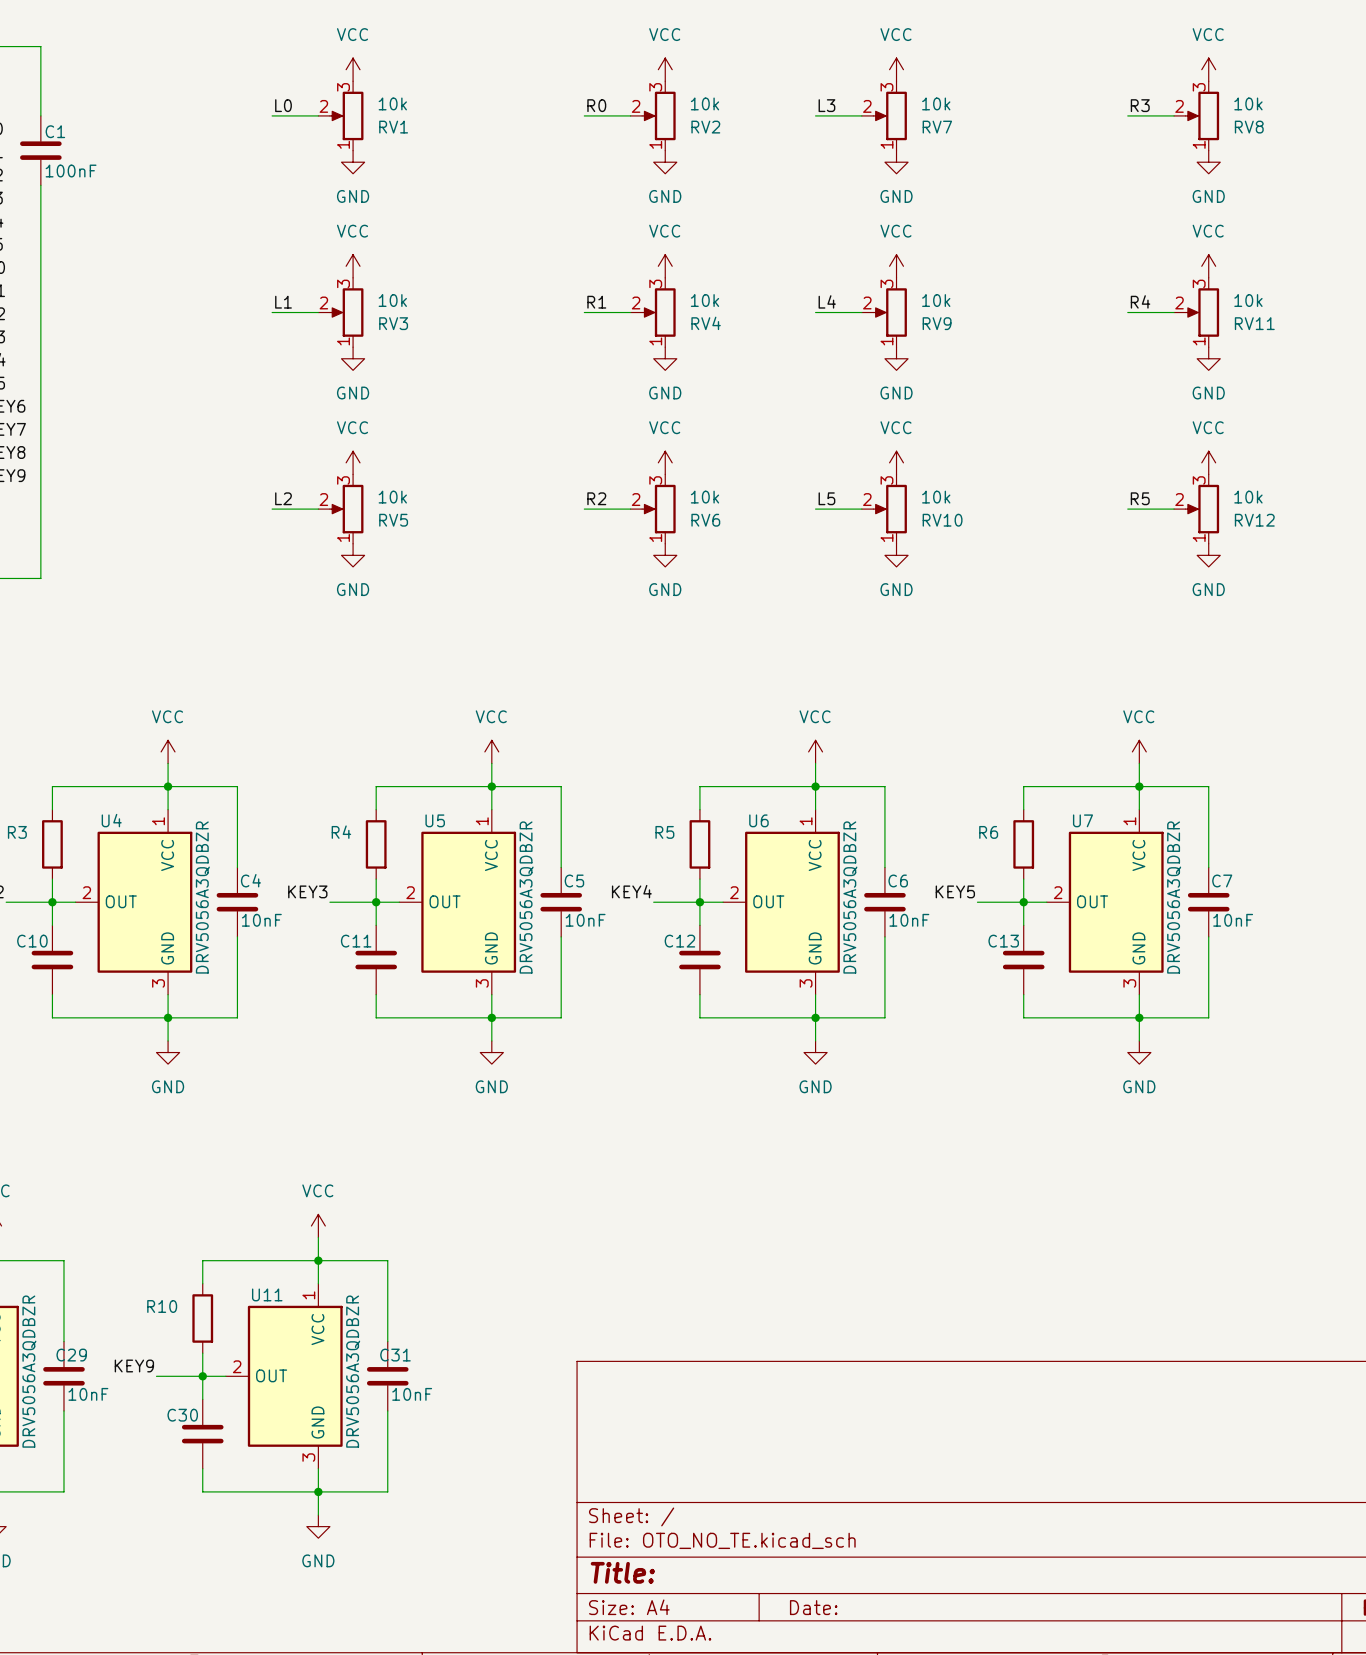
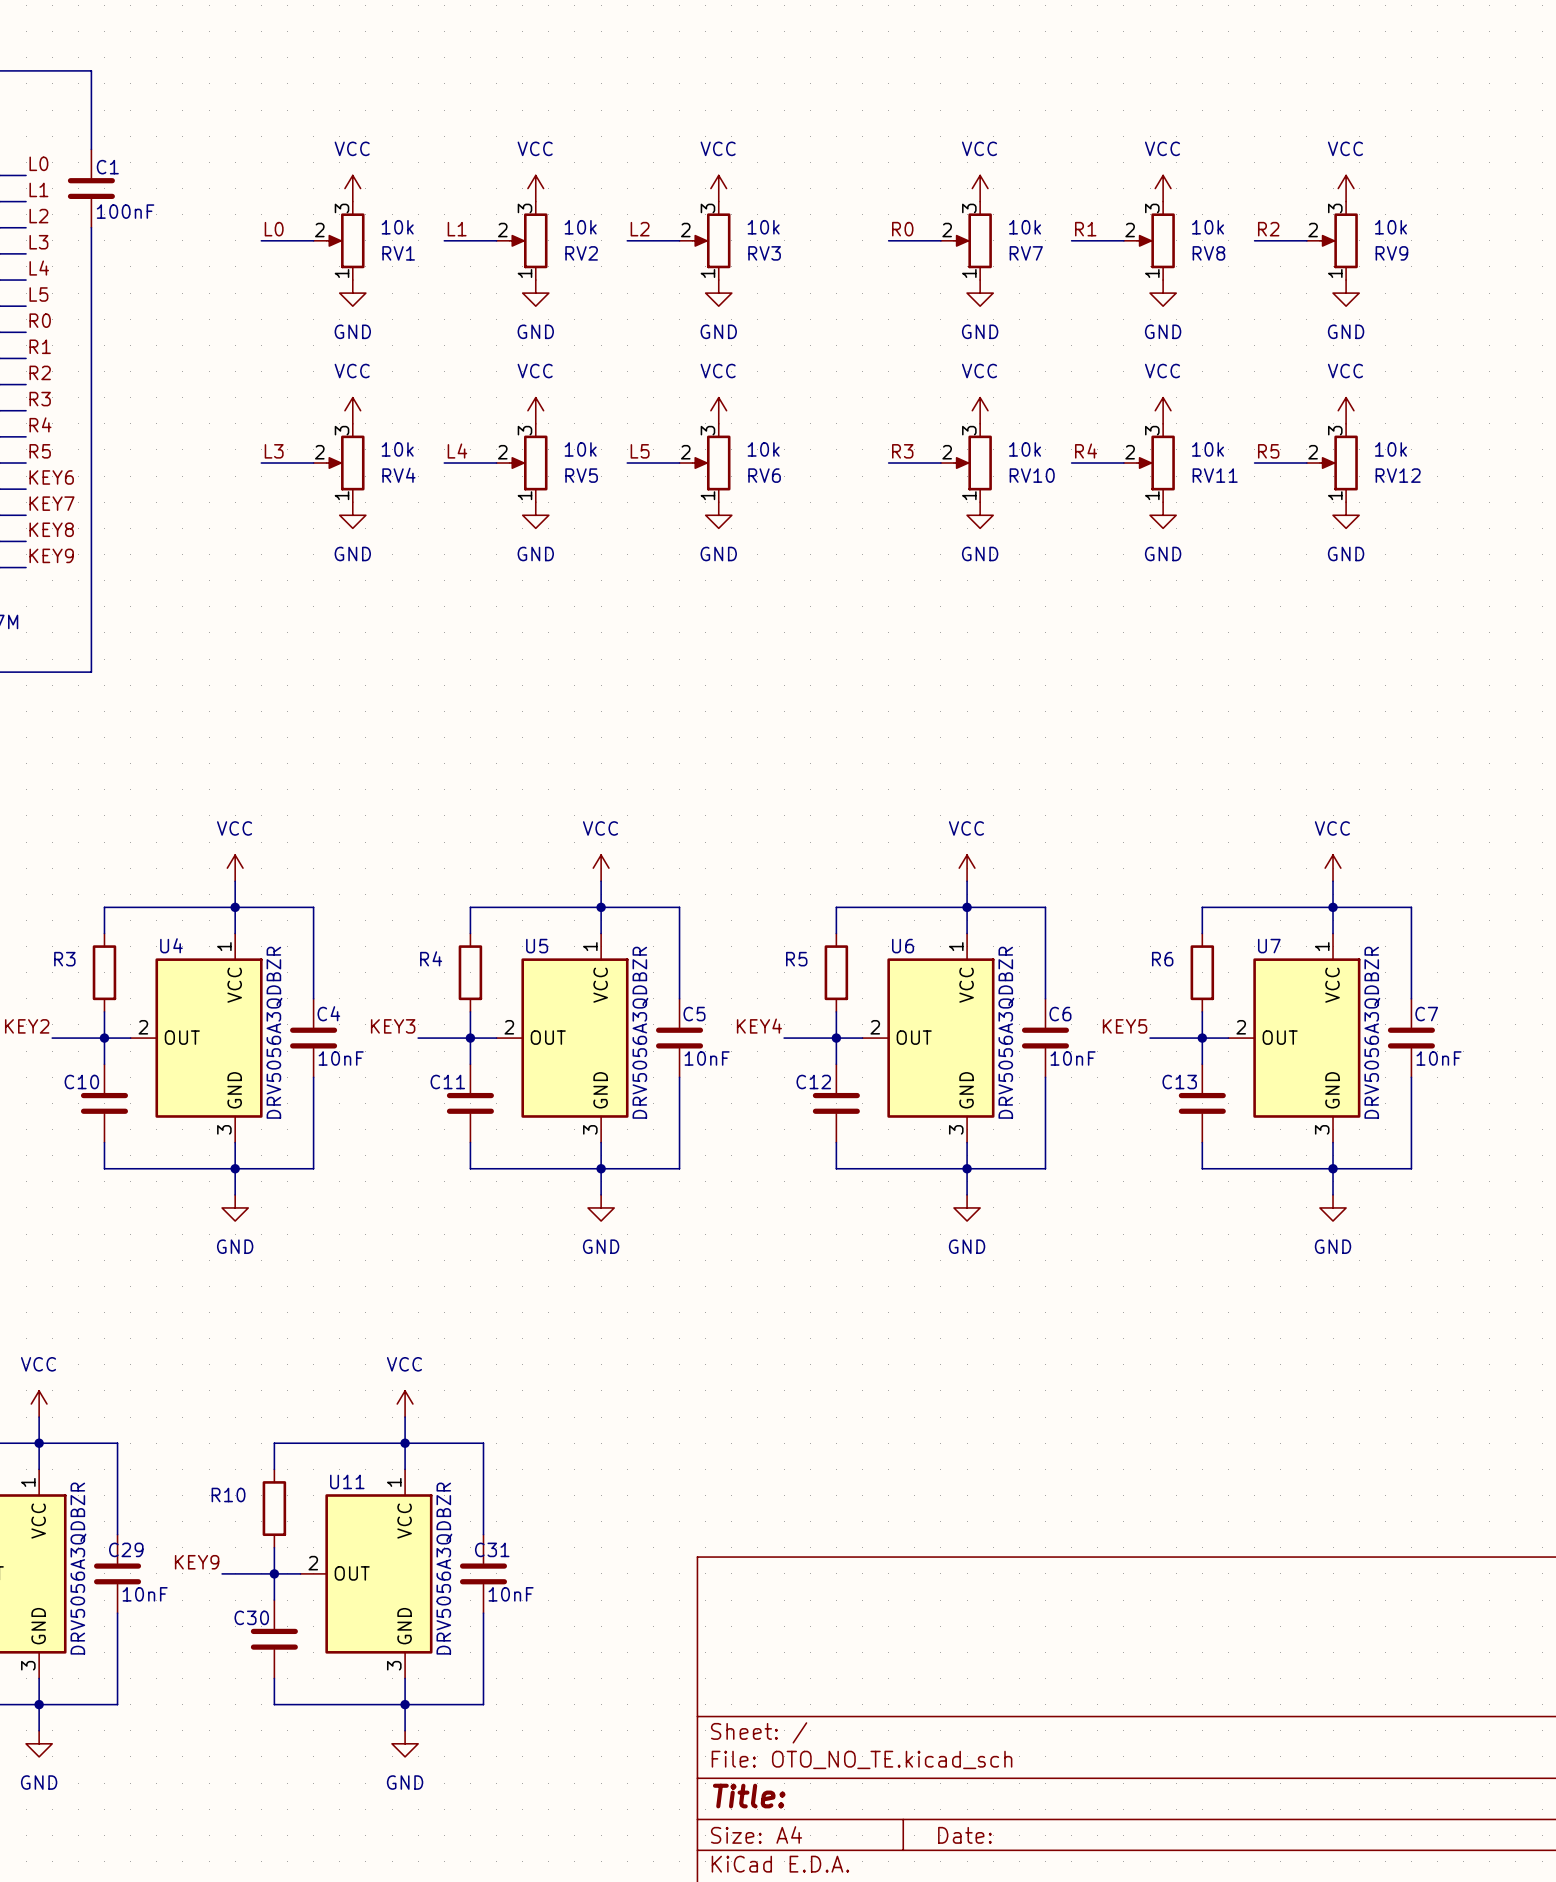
power symbol: VCC (353, 69) -> none
power symbol: VCC (665, 69) -> none
power symbol: VCC (896, 69) -> none
power symbol: VCC (1208, 69) -> none
label position: L0 (283, 105) -> L0 (274, 229)
label position: R0 (596, 105) -> R0 (902, 229)
label: L3 (826, 105) -> none
label: R3 (1140, 105) -> none
wire: (272, 115) (318, 115) -> (261, 240) (313, 240)
RV1 position: (340, 115) -> (339, 240)
wire: (584, 115) (630, 115) -> (627, 240) (679, 240)
RV2 position: (653, 115) -> (522, 240)
wire: (815, 115) (861, 115) -> (888, 240) (940, 240)
RV7 position: (884, 115) -> (966, 240)
wire: (1127, 115) (1174, 115) -> (1254, 240) (1306, 240)
RV8 position: (1196, 115) -> (1149, 240)
power symbol: none -> VCC (352, 188)
power symbol: none -> VCC (535, 188)
power symbol: none -> VCC (718, 188)
power symbol: none -> VCC (980, 188)
power symbol: none -> VCC (1163, 188)
power symbol: none -> VCC (1346, 188)
power symbol: GND (353, 162) -> none
power symbol: GND (665, 162) -> none
power symbol: GND (896, 162) -> none
power symbol: GND (1208, 162) -> none
label: none -> L2 (640, 229)
label: none -> R1 (1085, 229)
label: none -> R2 (1268, 229)
wire: none -> (444, 240) (496, 240)
wire: none -> (1071, 240) (1123, 240)
power symbol: none -> GND (352, 293)
power symbol: none -> GND (535, 293)
power symbol: none -> GND (718, 293)
power symbol: none -> GND (980, 293)
power symbol: none -> GND (1163, 293)
power symbol: none -> GND (1346, 293)
power symbol: VCC (353, 266) -> none
power symbol: VCC (665, 266) -> none
power symbol: VCC (896, 266) -> none
power symbol: VCC (1208, 266) -> none
label: L4 (827, 301) -> none
label: R4 (1140, 301) -> none
label position: L1 (283, 302) -> L1 (457, 229)
label: R1 (596, 302) -> none
wire: (272, 312) (318, 312) -> (261, 463) (313, 463)
RV3 position: (340, 312) -> (705, 240)
wire: (584, 312) (630, 312) -> (627, 463) (679, 463)
RV4 position: (653, 312) -> (339, 463)
wire: (815, 312) (861, 312) -> (888, 463) (940, 463)
RV9 position: (884, 312) -> (1332, 240)
wire: (1127, 312) (1174, 312) -> (1254, 463) (1306, 463)
RV11 position: (1196, 312) -> (1149, 463)
power symbol: none -> VCC (352, 410)
power symbol: none -> VCC (535, 410)
power symbol: none -> VCC (718, 410)
power symbol: none -> VCC (980, 410)
power symbol: none -> VCC (1163, 410)
power symbol: none -> VCC (1346, 410)
power symbol: GND (353, 358) -> none
power symbol: GND (665, 358) -> none
power symbol: GND (896, 358) -> none
power symbol: GND (1208, 358) -> none
label: none -> L4 (457, 451)
label: none -> R4 (1086, 451)
label: none -> L3 (274, 451)
label: none -> L5 (640, 451)
label: none -> R3 (902, 451)
power symbol: none -> GND (352, 515)
power symbol: none -> GND (535, 515)
power symbol: none -> GND (718, 515)
power symbol: none -> GND (980, 515)
power symbol: none -> GND (1163, 515)
power symbol: none -> GND (1346, 515)
power symbol: VCC (353, 462) -> none
power symbol: VCC (665, 462) -> none
power symbol: VCC (896, 462) -> none
power symbol: VCC (1208, 462) -> none
label: L2 (283, 498) -> none
label: R2 (596, 498) -> none
label: L5 (826, 498) -> none
label position: R5 (1140, 498) -> R5 (1268, 451)
wire: (272, 509) (318, 509) -> (444, 463) (496, 463)
RV5 position: (340, 509) -> (522, 463)
wire: (584, 509) (630, 509) -> none
RV6 position: (653, 509) -> (705, 463)
wire: (815, 509) (861, 509) -> (1071, 463) (1123, 463)
RV10 position: (884, 509) -> (966, 463)
wire: (1127, 509) (1174, 509) -> none
RV12 position: (1196, 509) -> (1332, 463)
power symbol: GND (353, 555) -> none
power symbol: GND (665, 555) -> none
power symbol: GND (896, 555) -> none
power symbol: GND (1208, 555) -> none

